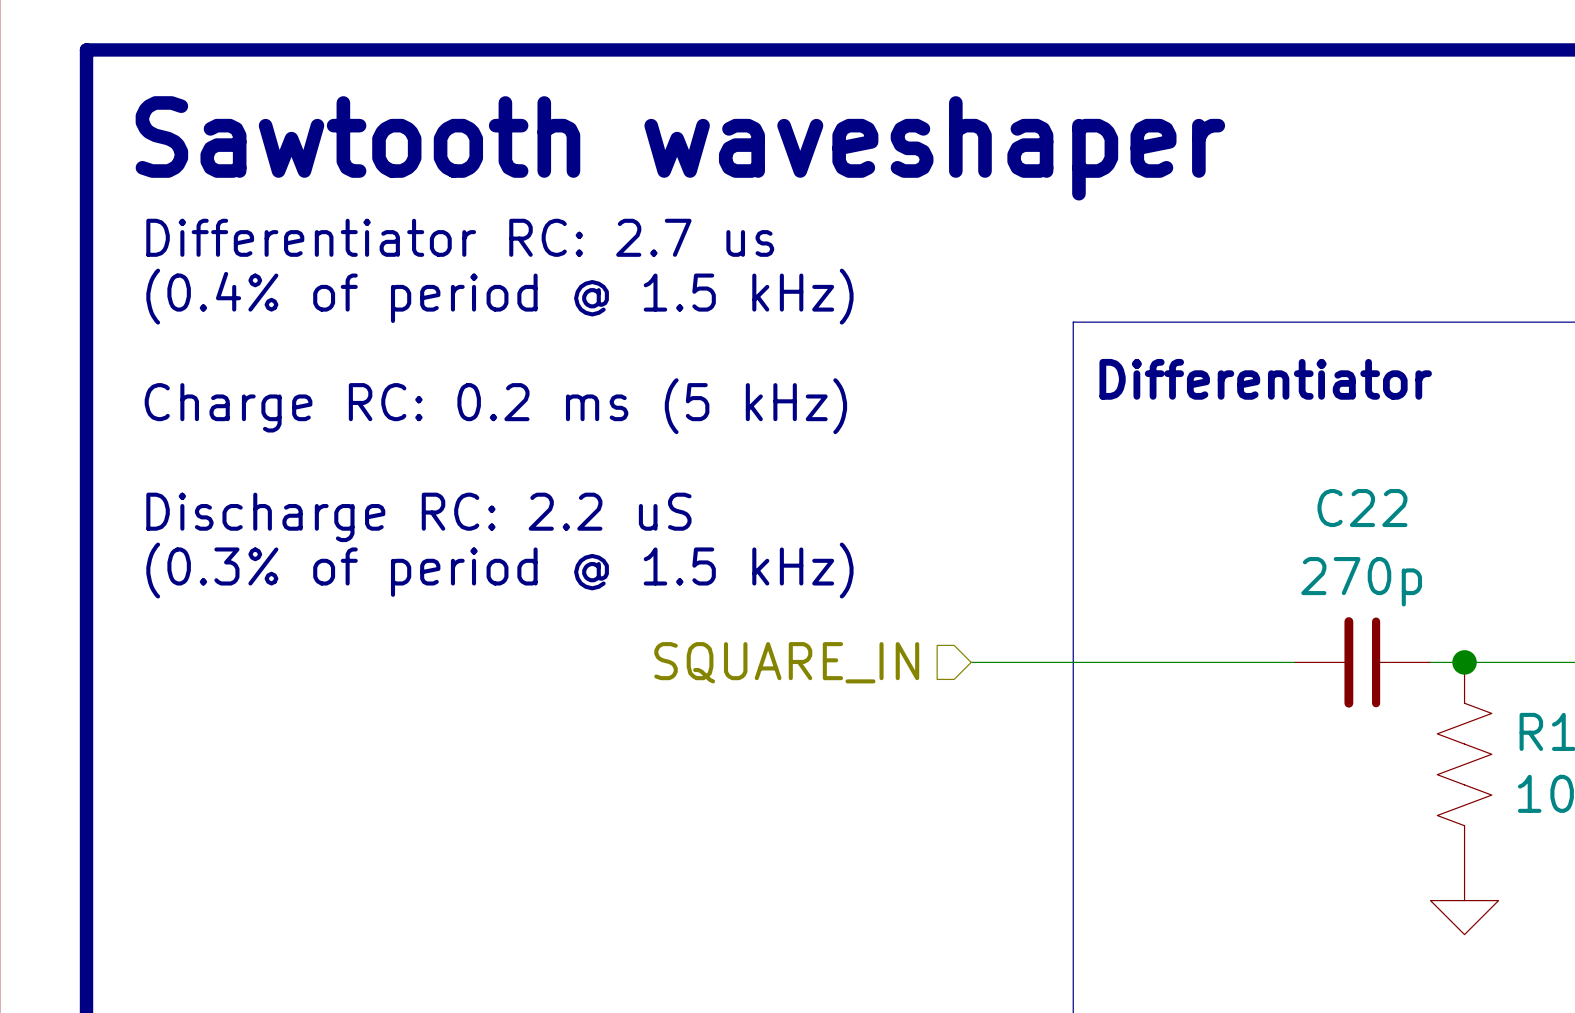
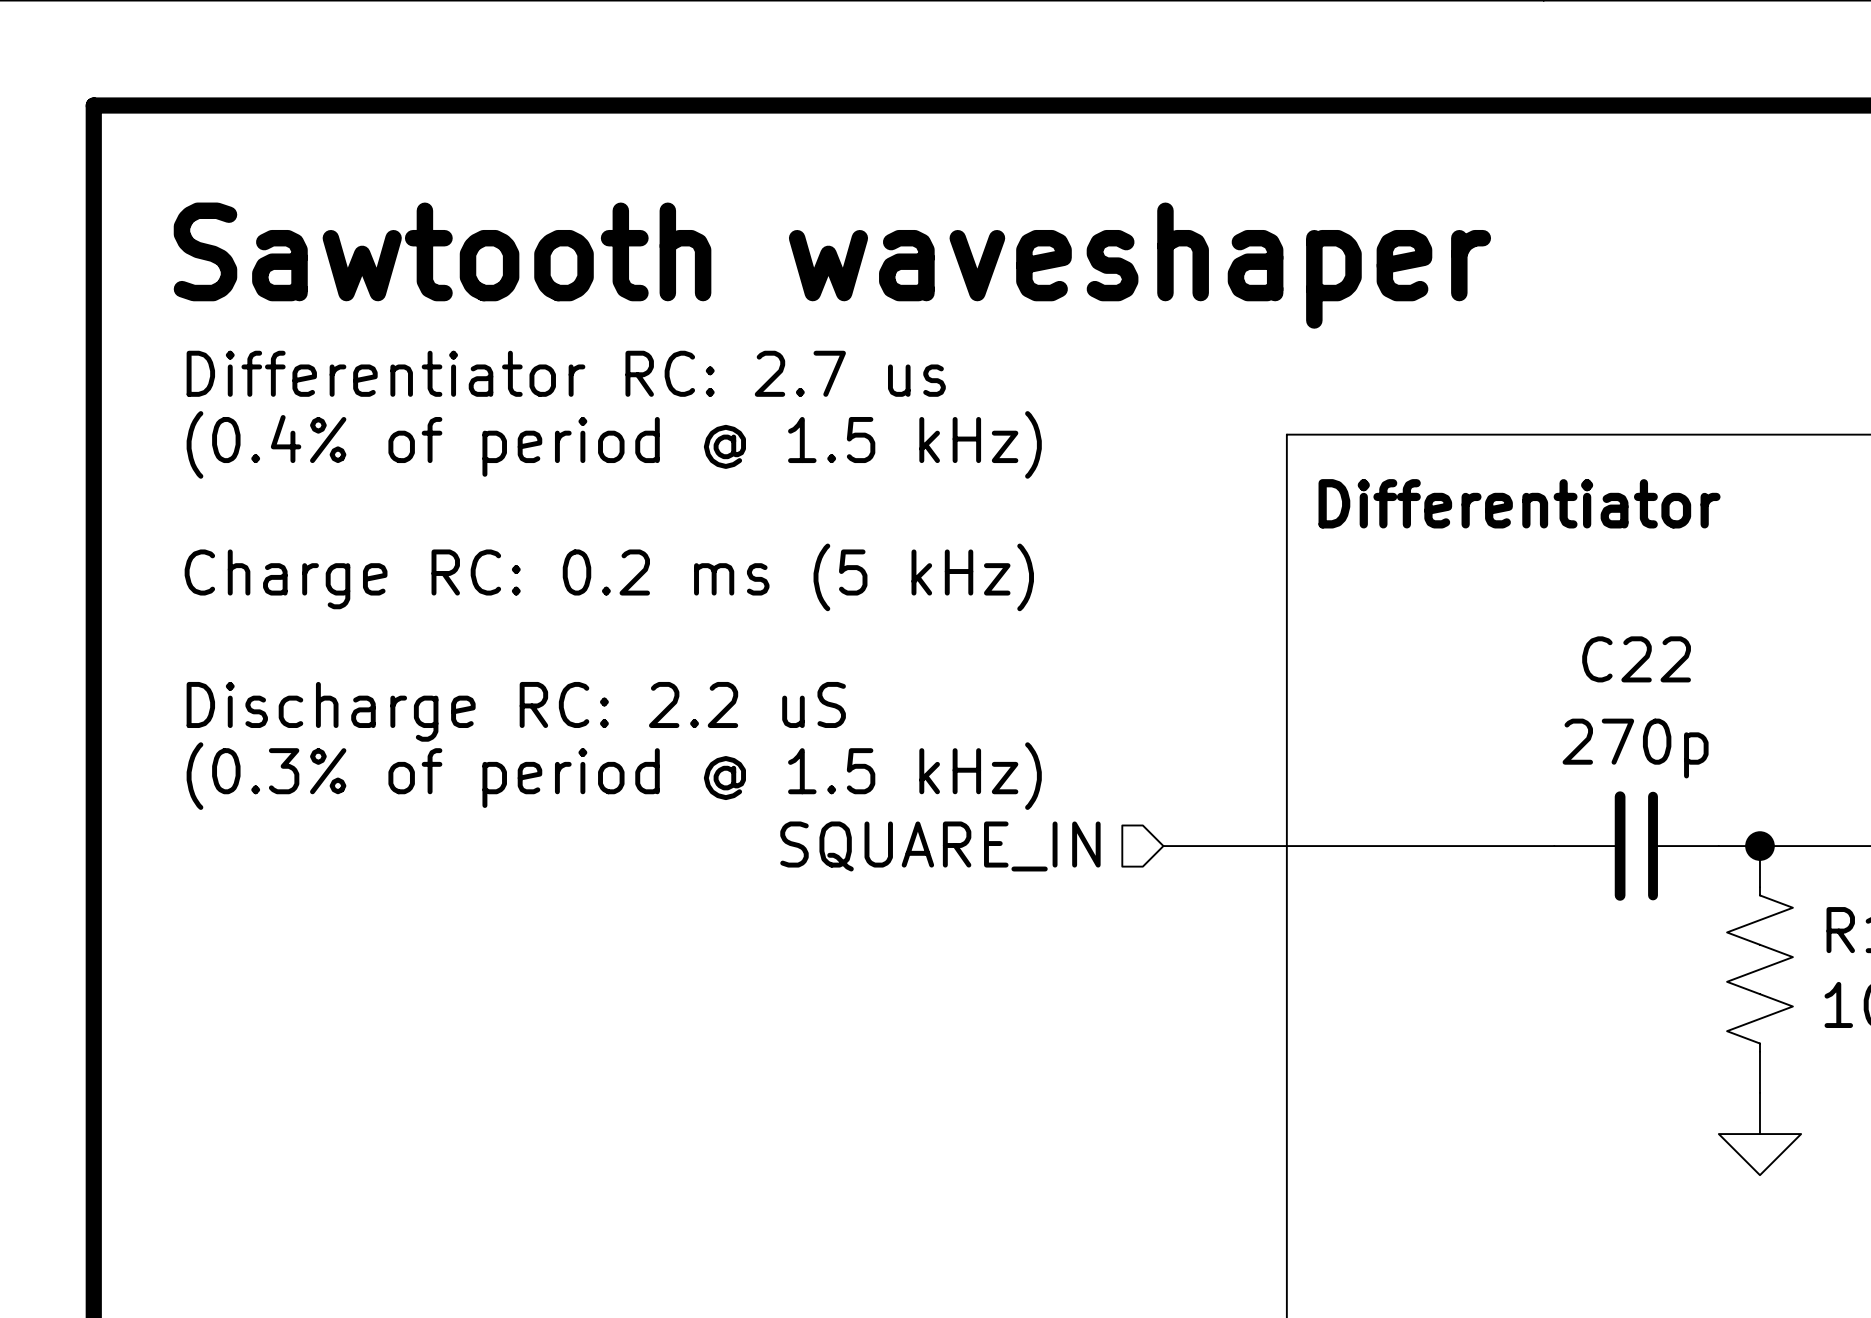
text position: Sawtooth waveshaper (680, 148) -> Sawtooth waveshaper (832, 265)
text position: Differentiator RC: 2.7 us (460, 237) -> Differentiator RC: 2.7 us (566, 373)
text position: (0.4% of period @ 1.5 kHz) (499, 296) -> (0.4% of period @ 1.5 kHz) (614, 444)
text position: Charge RC: 0.2 ms (5 kHz) (495, 406) -> Charge RC: 0.2 ms (5 kHz) (609, 577)
text position: Discharge RC: 2.2 uS (418, 517) -> Discharge RC: 2.2 uS (516, 711)
text position: (0.3% of period @ 1.5 kHz) (499, 570) -> (0.3% of period @ 1.5 kHz) (614, 776)

